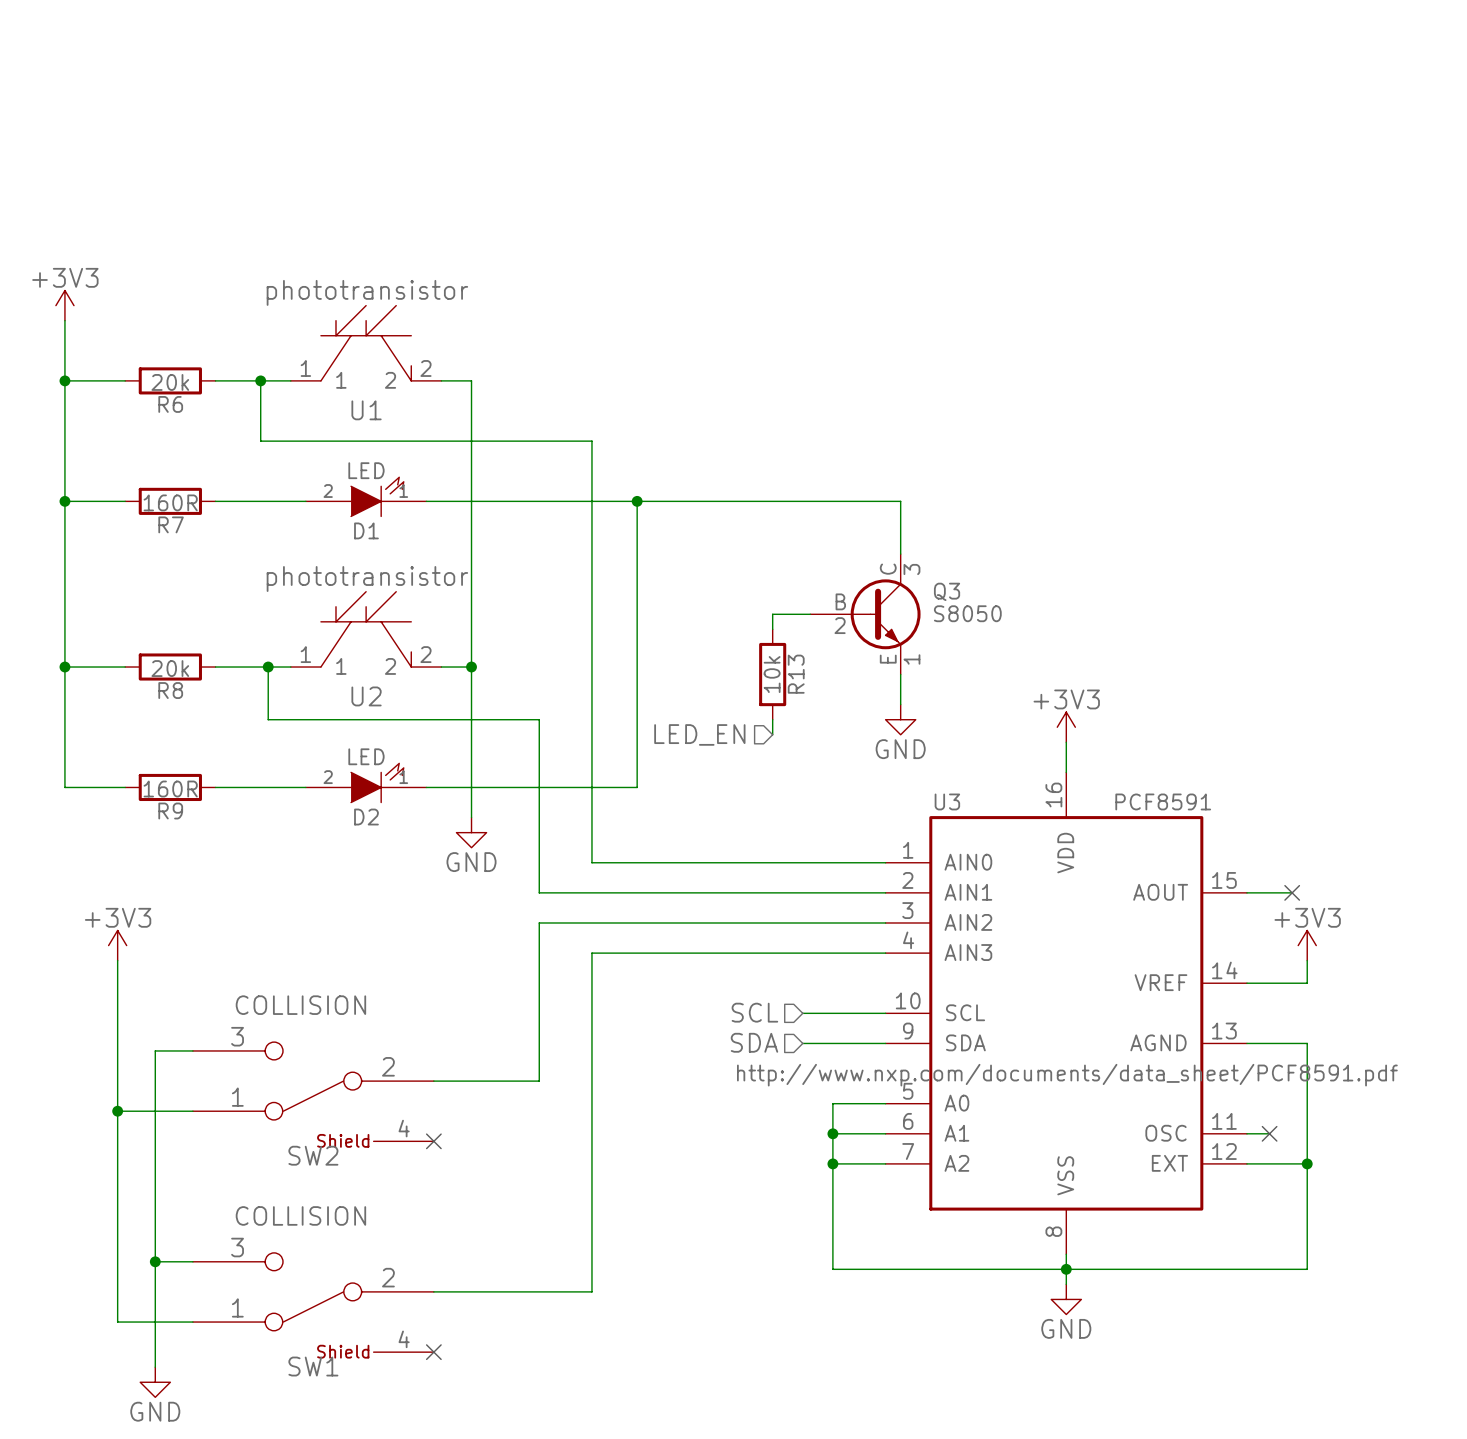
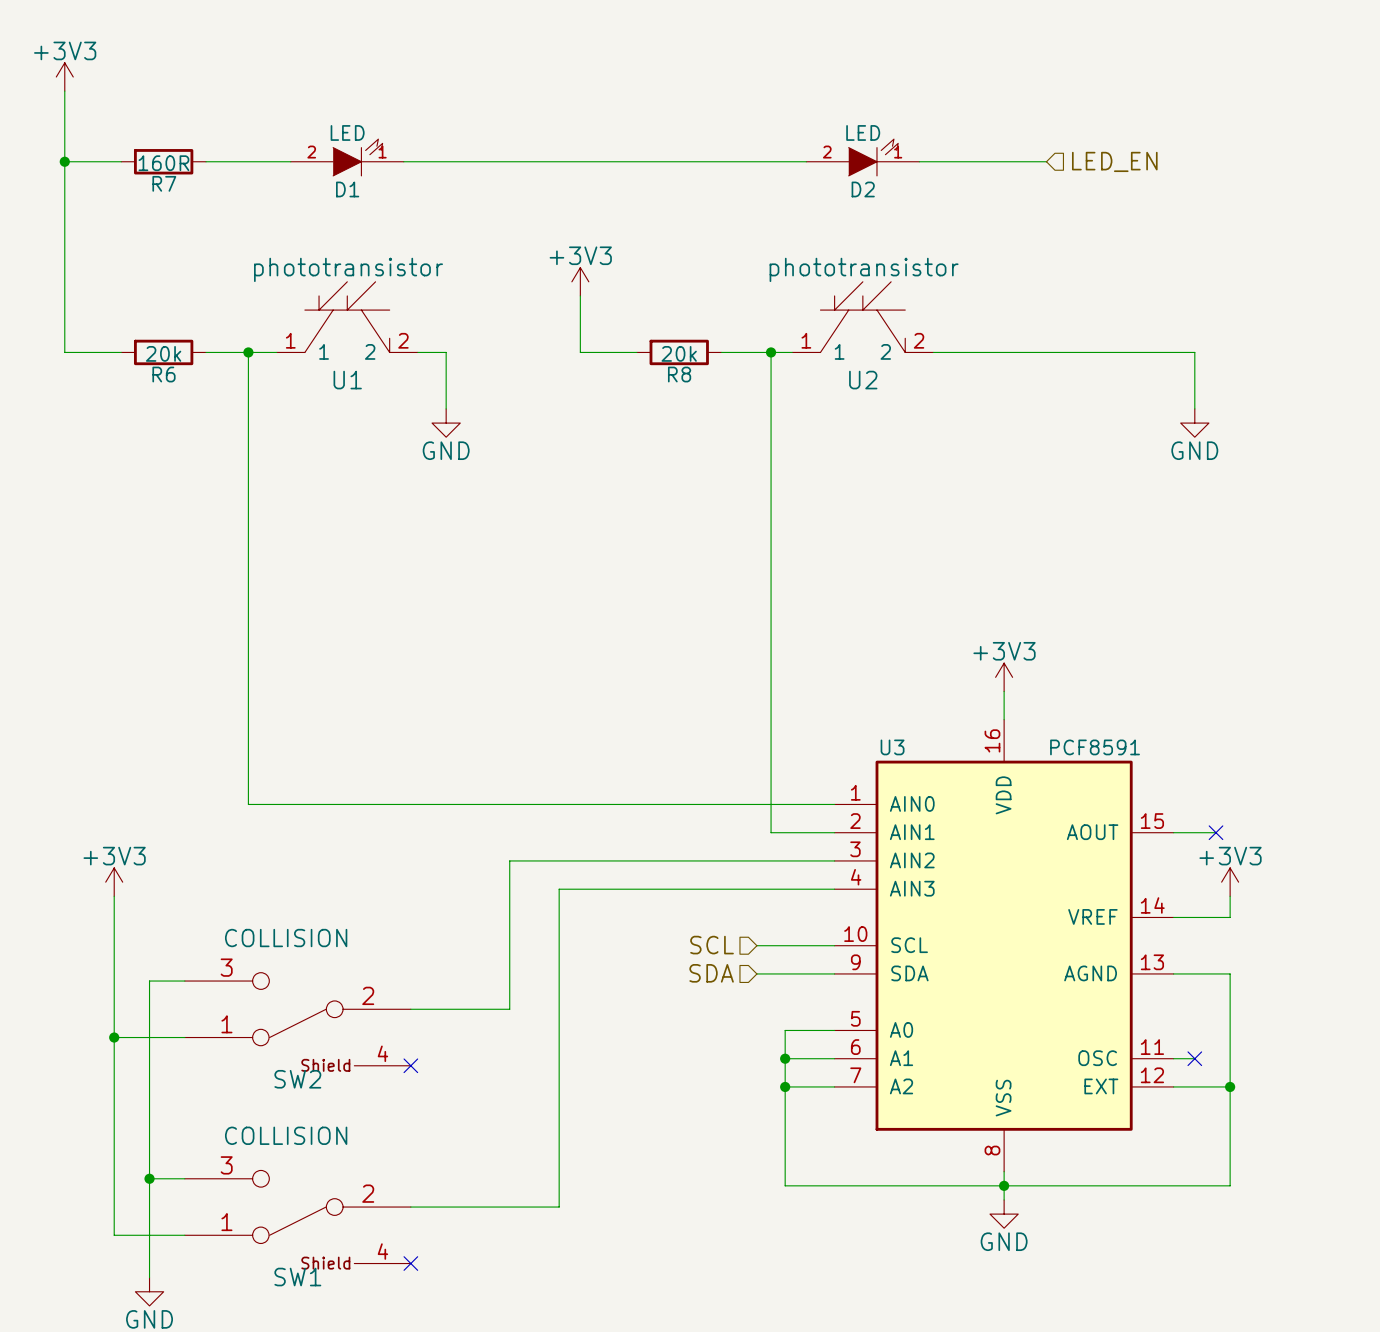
wire: none -> (64, 91) (64, 295)
wire: none -> (64, 161) (121, 161)
junction: none -> (64, 161)
wire: none -> (206, 161) (290, 161)
wire: none -> (403, 161) (806, 161)
wire: none -> (919, 161) (1046, 161)
hierarchical label: none -> LED_EN (1114, 161)
power symbol position: +3V3 (64, 305) -> +3V3 (64, 77)
power symbol: none -> +3V3 (580, 281)
wire: none -> (580, 295) (580, 352) (636, 352)
wire: (64, 380) (64, 787) (125, 787) -> none
junction: (64, 380) -> none
wire: none -> (721, 352) (792, 352)
junction: none -> (771, 352)
wire: none -> (933, 352) (1194, 352) (1194, 408)
wire: (260, 441) (591, 441) (591, 862) -> (248, 408) (248, 804) (559, 804)
wire: (471, 441) (471, 817) -> none
power symbol: none -> GND (446, 423)
power symbol: none -> GND (1194, 423)
D1 position: (366, 496) -> (347, 157)
wire: (64, 501) (125, 501) -> none
junction: (64, 501) -> none
R7 position: (170, 501) -> (163, 161)
wire: (215, 501) (305, 501) -> none
wire: (426, 501) (900, 501) (900, 554) -> none
wire: (637, 501) (637, 787) (426, 787) -> none
junction: (637, 501) -> none
wire: (810, 614) (772, 614) (772, 629) -> none
Q3: S8050 (865, 614) -> none
U2 position: (366, 629) -> (862, 317)
wire: (64, 667) (125, 667) -> none
junction: (64, 667) -> none
R8 position: (170, 667) -> (679, 352)
wire: (215, 667) (290, 667) -> none
wire: (268, 667) (268, 719) (539, 719) (539, 892) (817, 892) -> (771, 352) (771, 832)
junction: (268, 667) -> none
wire: (441, 667) (471, 667) -> none
junction: (471, 667) -> none
R13: 10k (772, 674) -> none
wire: (900, 674) (900, 704) -> none
wire: (772, 719) (772, 734) -> none
power symbol: GND (900, 719) -> none
hierarchical label: LED_EN (699, 734) -> none
D2 position: (366, 782) -> (862, 157)
R9: 160R (170, 787) -> none
wire: (215, 787) (305, 787) -> none
power symbol: GND (471, 832) -> none
U3 text: http://www.nxp.com/documents/data_sheet/PCF8591.pdf (1067, 1075) -> none

